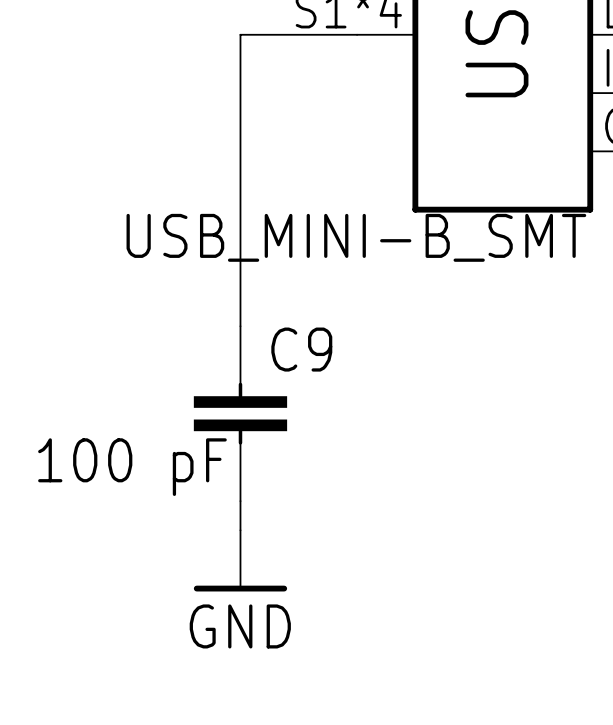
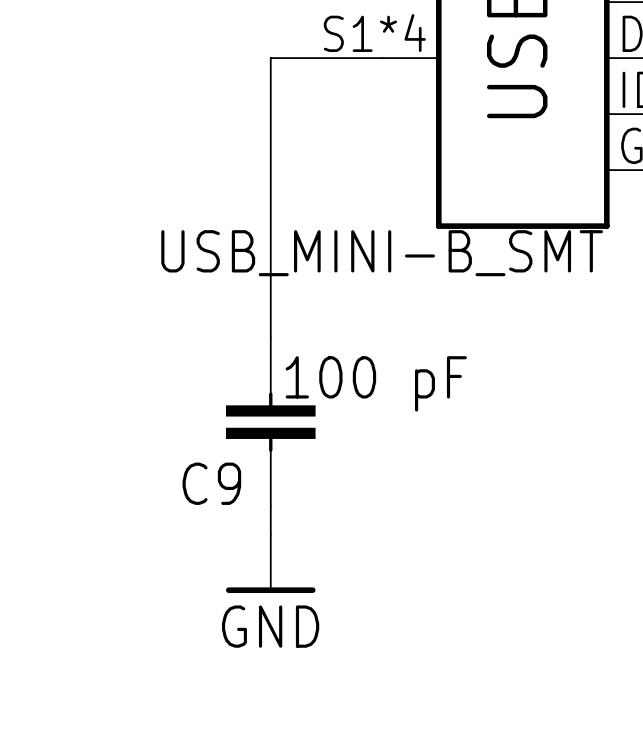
C9 name position: C9 (301, 349) -> C9 (211, 483)
C9 value position: 100 pF (132, 467) -> 100 pF (376, 383)

